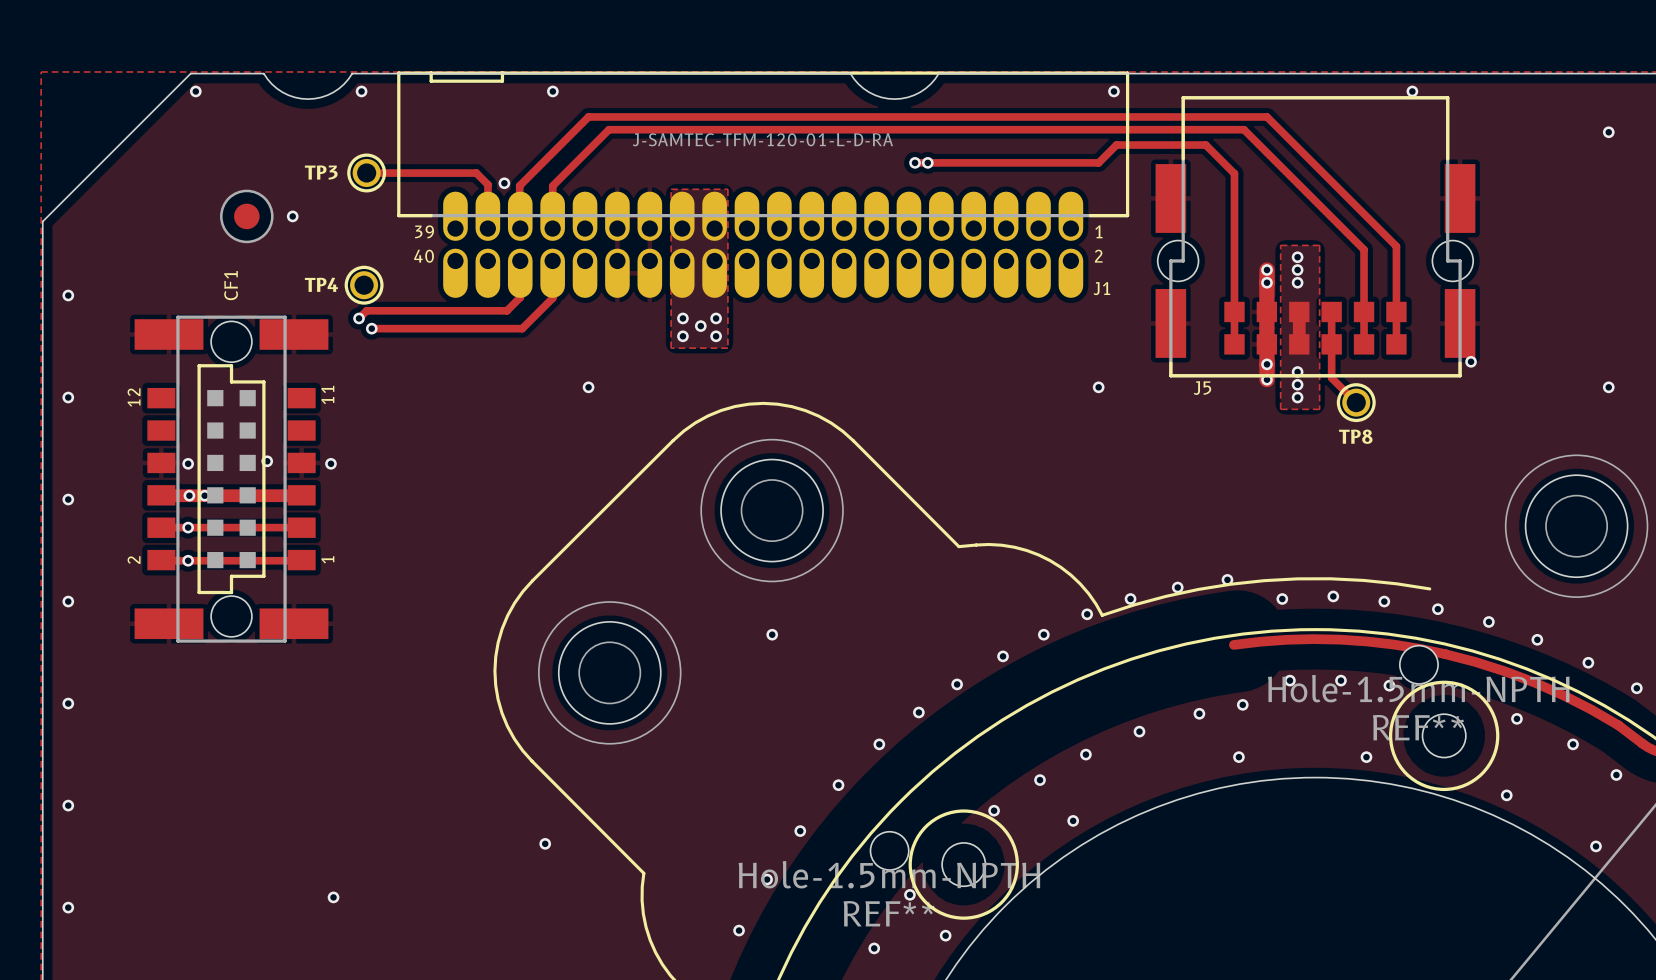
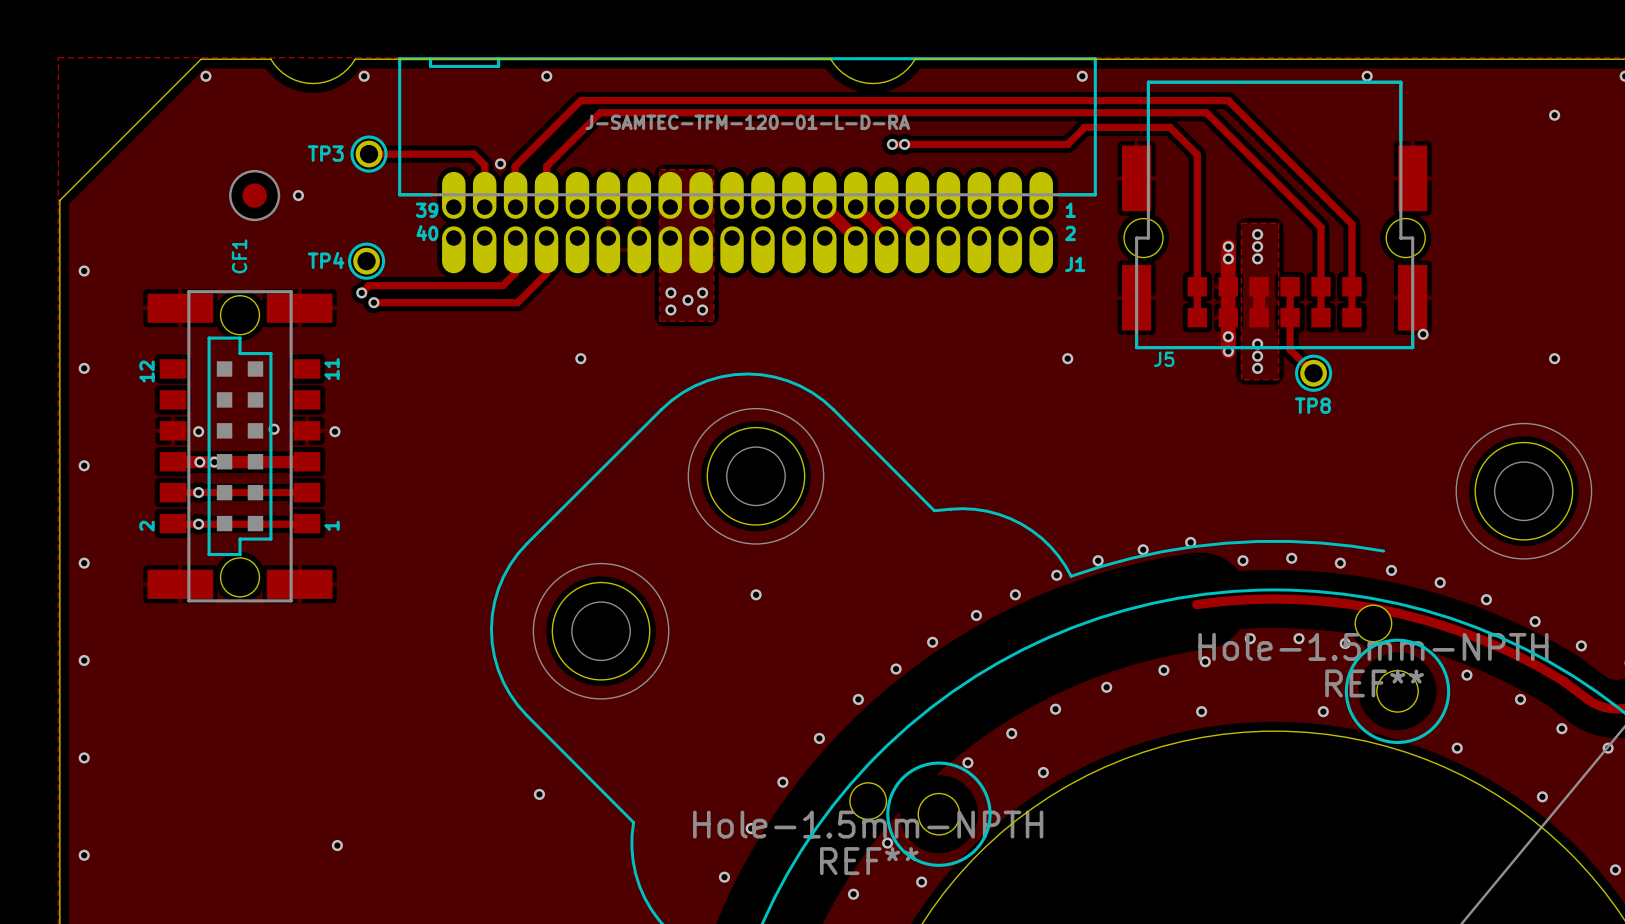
track: none -> (824, 207) (855, 238)
track: none -> (855, 207) (886, 238)
track: none -> (886, 207) (917, 238)

